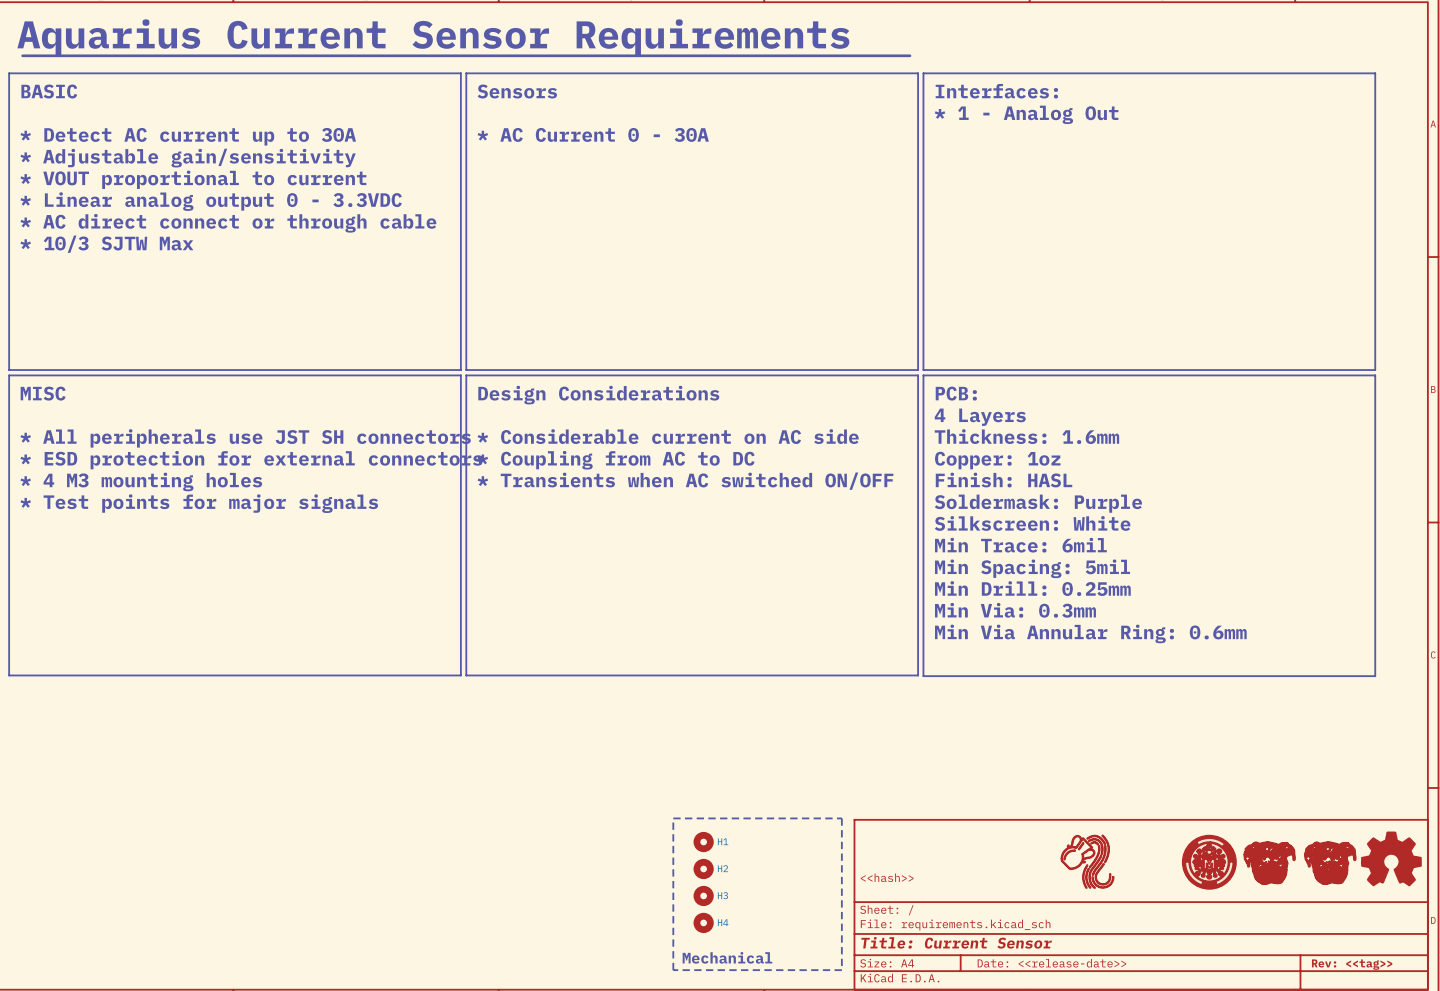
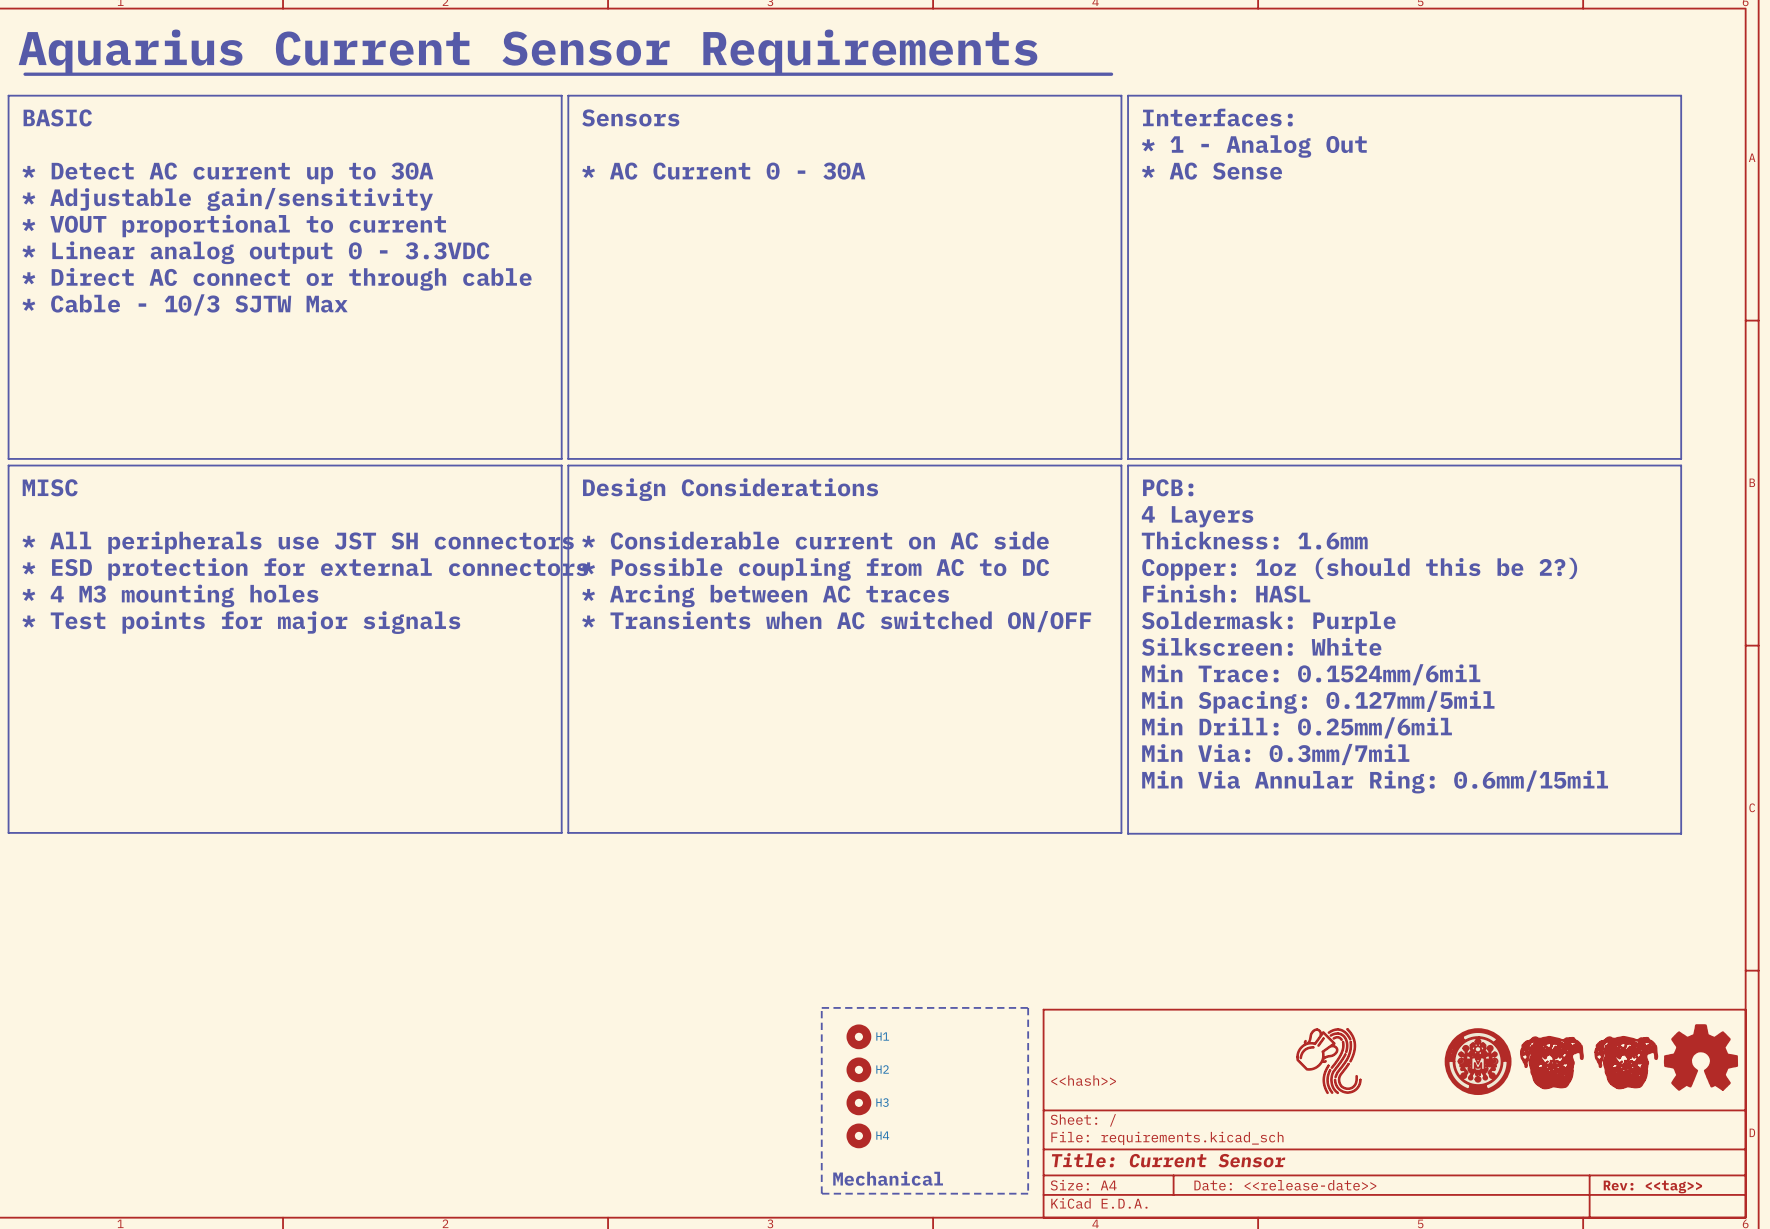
text: none -> * AC Sense (1211, 171)
text: * AC direct connect or through cable (228, 223) -> * Direct AC connect or through cable (277, 279)
text: * 10/3 SJTW Max (106, 244) -> * Cable - 10/3 SJTW Max (185, 304)
text: * Coupling from AC to DC (616, 460) -> * Possible coupling from AC to DC (815, 569)
text: Copper: 1oz (997, 460) -> Copper: 1oz (should this be 2?) (1359, 569)
text: * Transients when AC switched ON/OFF (685, 481) -> * Arcing between AC traces (765, 596)
text: none -> * Transients when AC switched ON/OFF (836, 621)
text: Min Trace: 6mil (1020, 545) -> Min Trace: 0.1524mm/6mil (1311, 674)
text: Min Spacing: 5mil (1032, 568) -> Min Spacing: 0.127mm/5mil (1318, 702)
text: Min Drill: 0.25mm (1032, 588) -> Min Drill: 0.25mm/6mil (1297, 727)
text: Min Via: 0.3mm (1015, 610) -> Min Via: 0.3mm/7mil (1275, 754)
text: Min Via Annular Ring: 0.6mm (1090, 633) -> Min Via Annular Ring: 0.6mm/15mil (1375, 781)

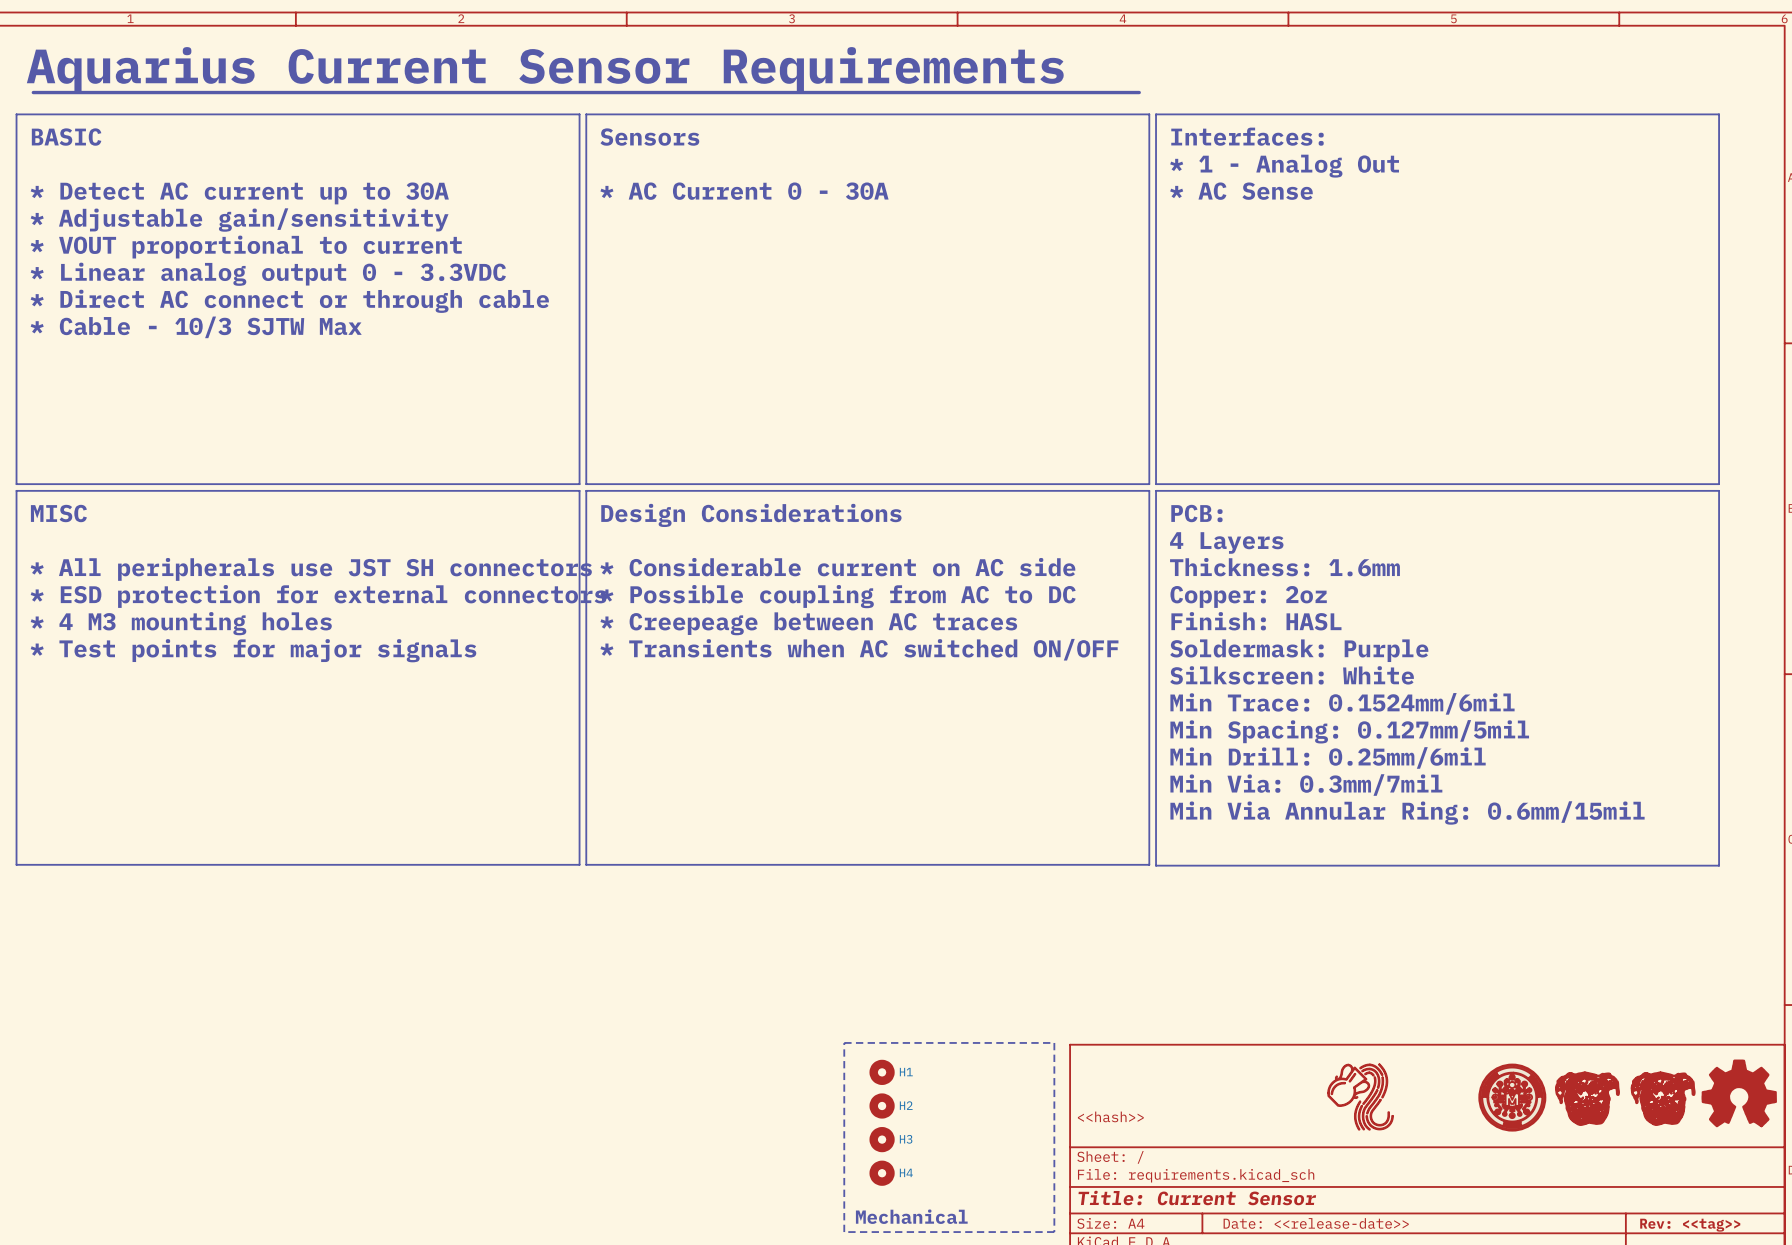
text: Copper: 1oz (should this be 2?) (1359, 569) -> Copper: 2oz (1248, 596)
text: * Arcing between AC traces (765, 596) -> * Creepeage between AC traces (808, 623)

